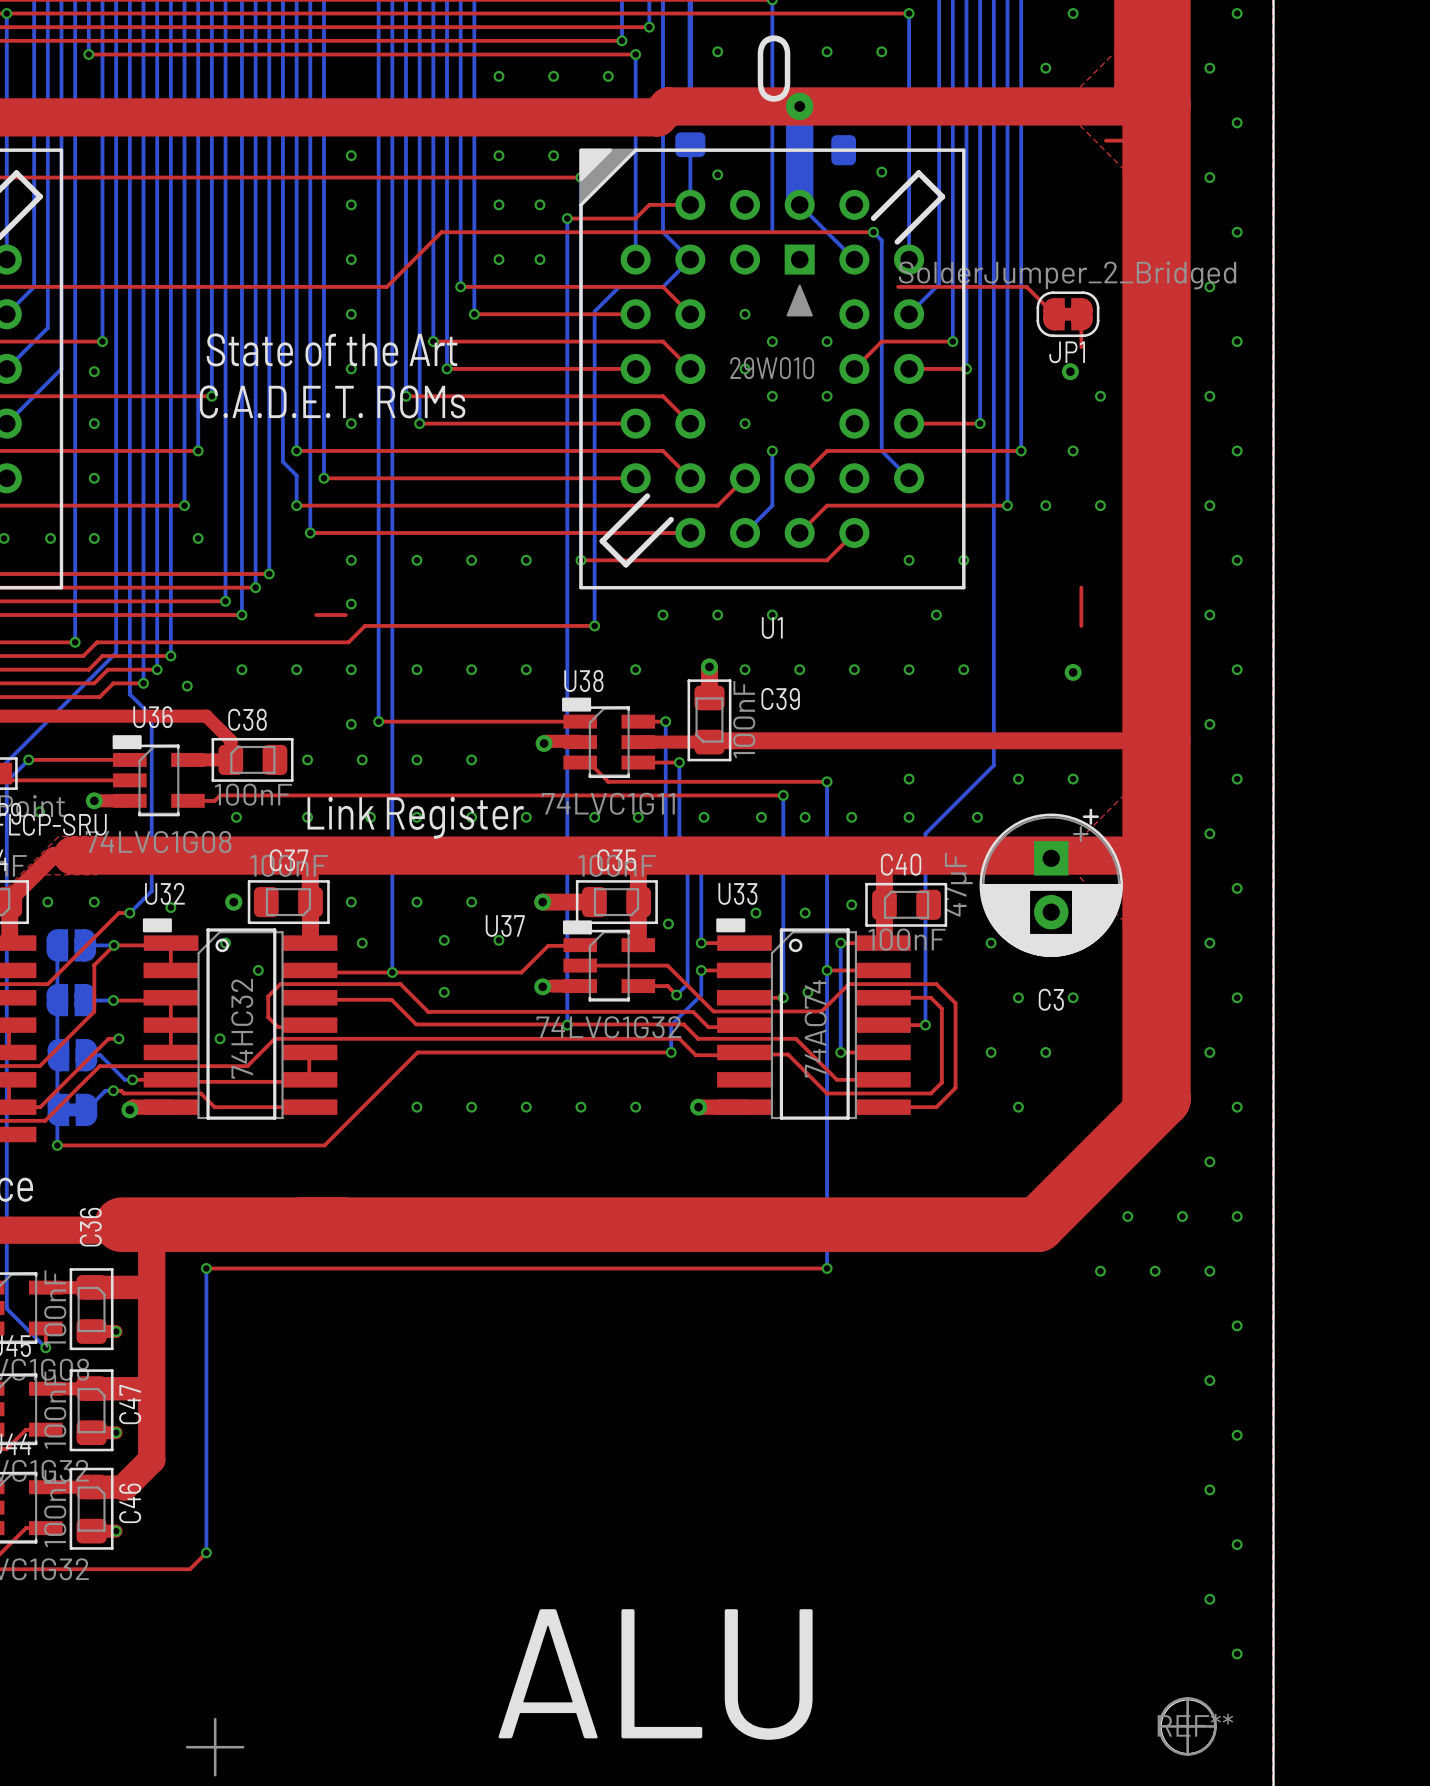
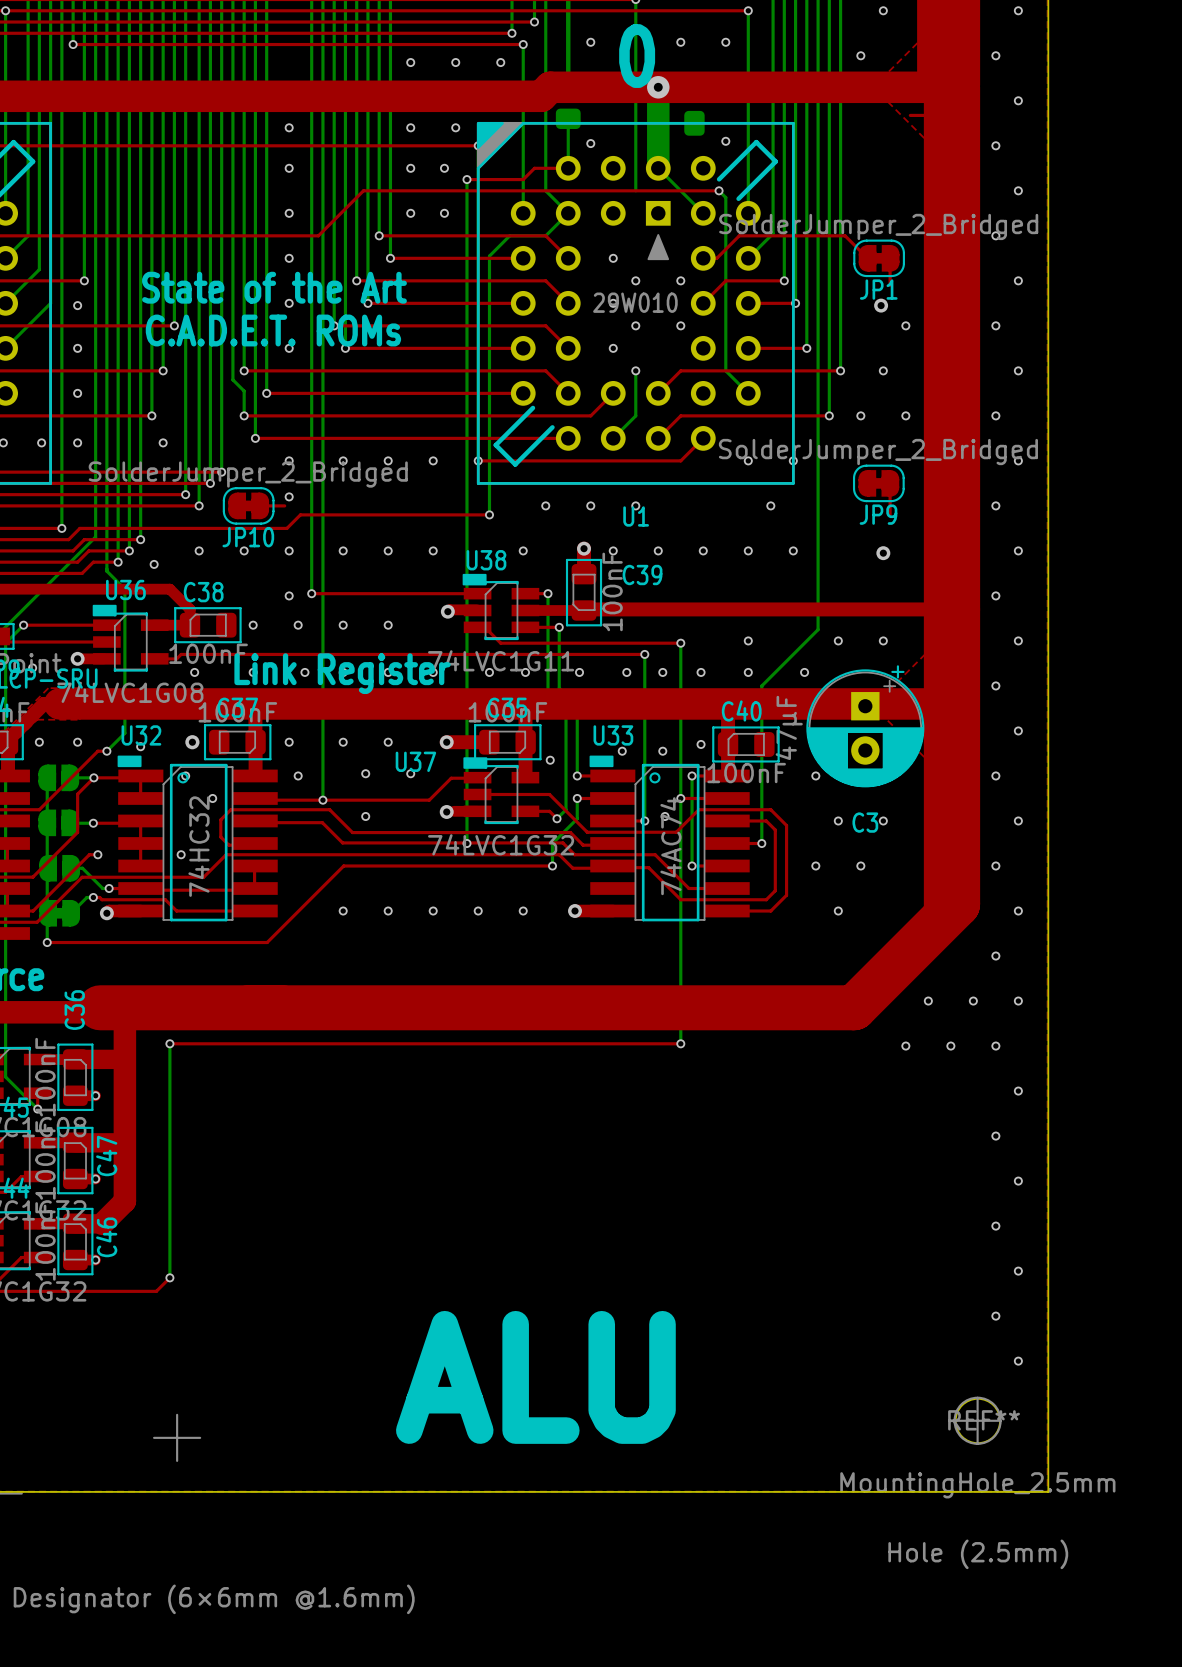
top track: none -> (739, 235) (716, 258) (703, 258)
JP9: none -> SolderJumper_2_Bridged (878, 483)
JP10: none -> SolderJumper_2_Bridged (248, 505)

